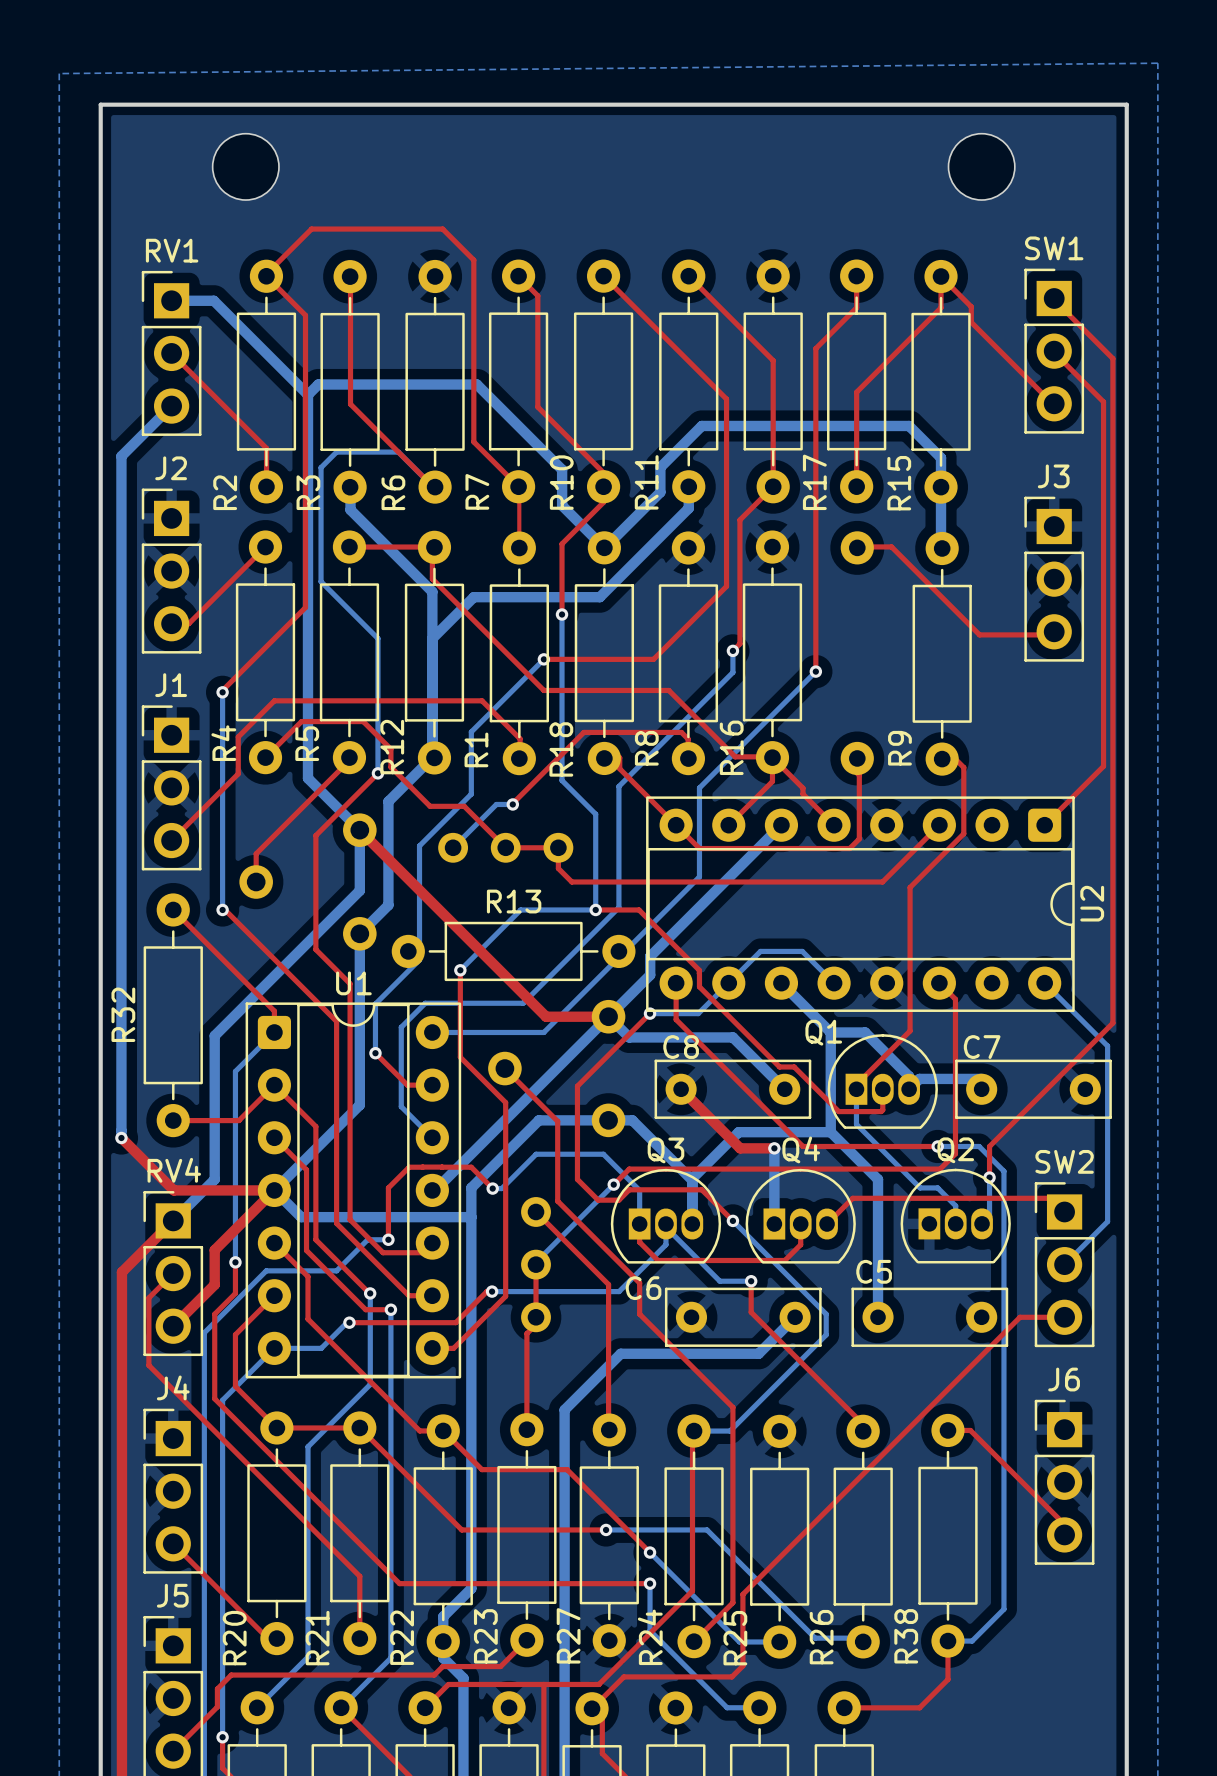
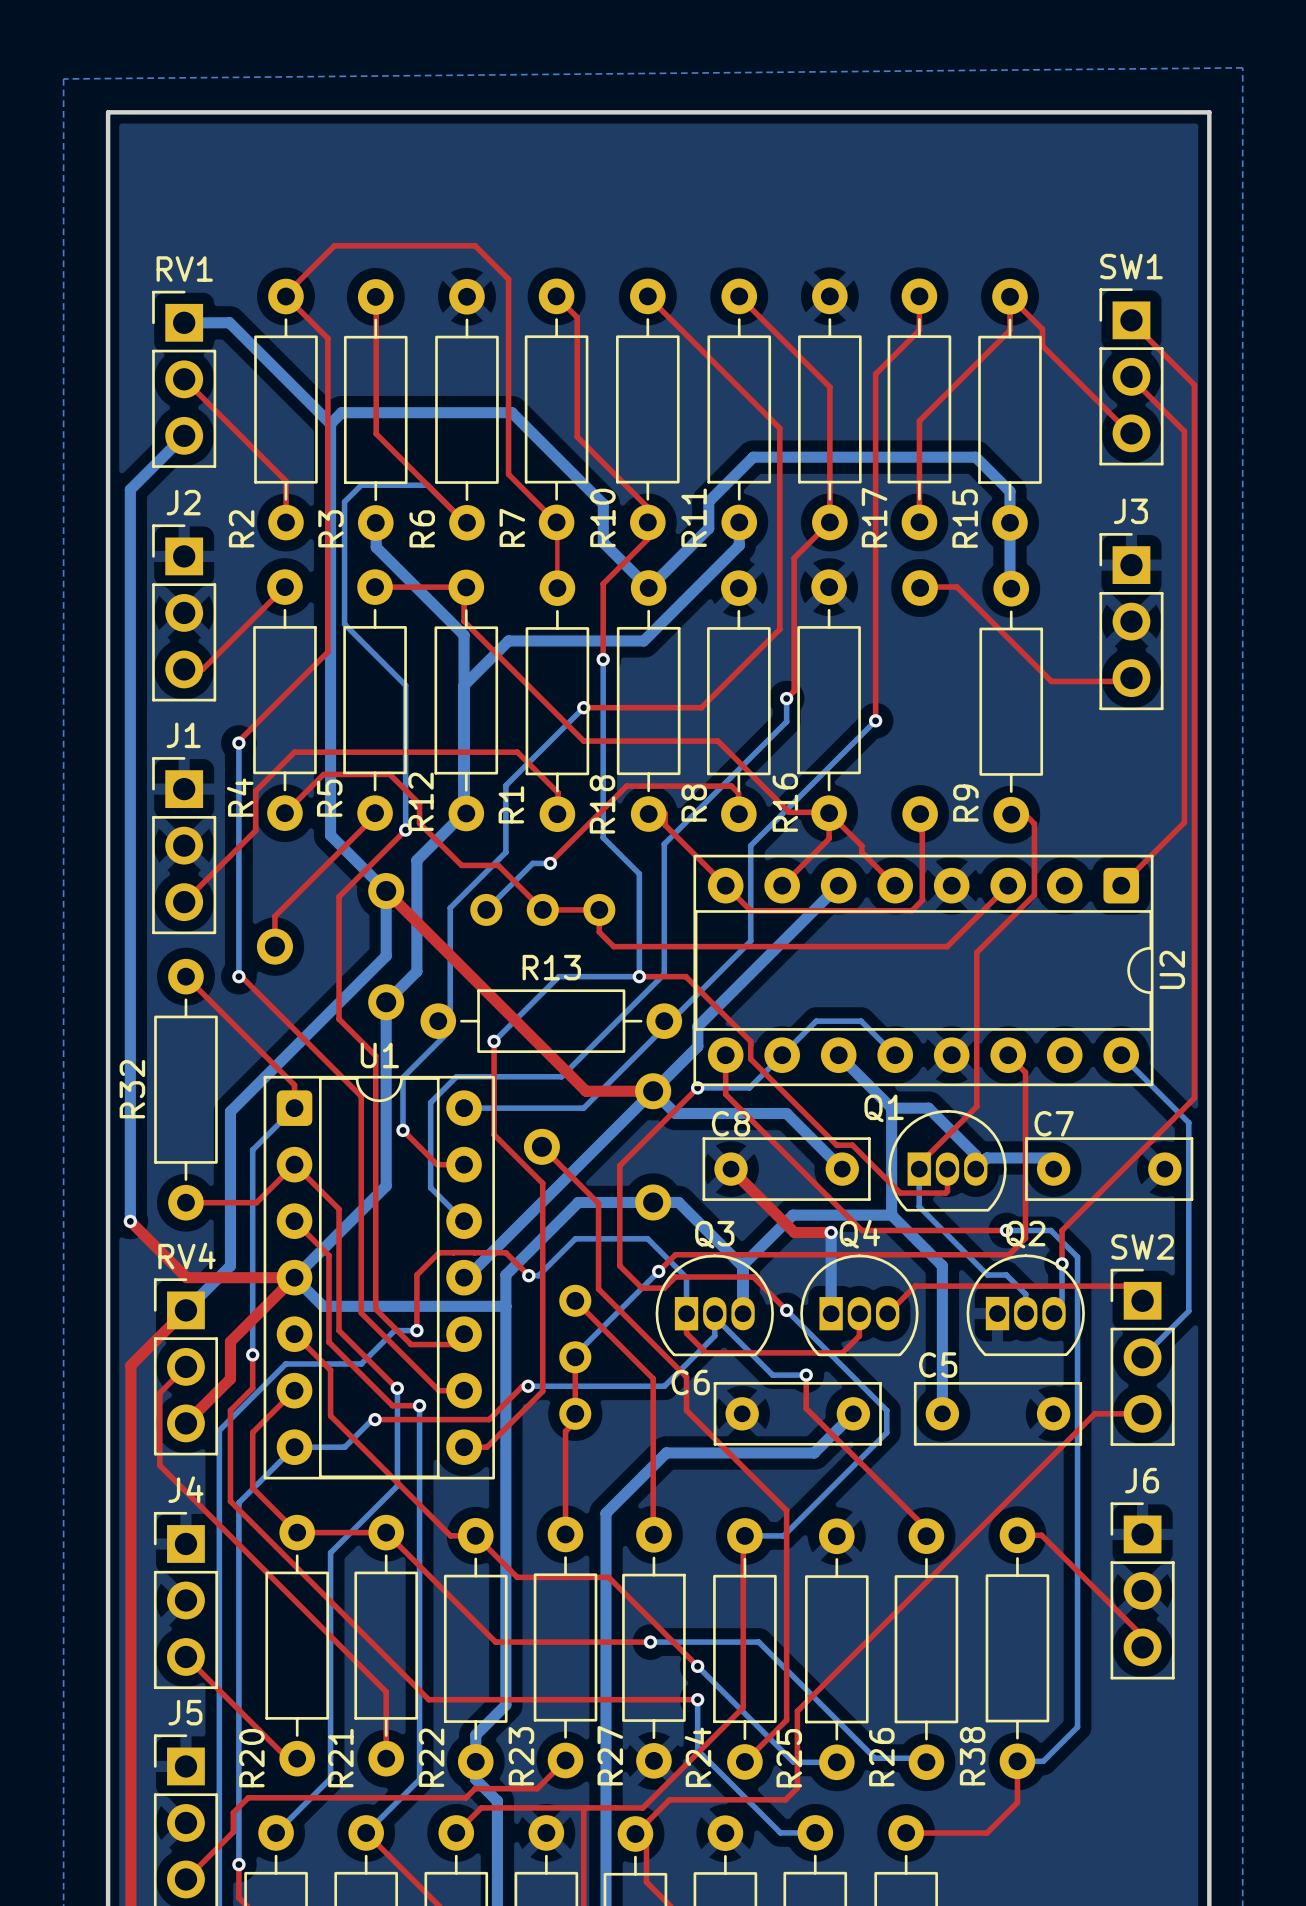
part: (245, 166) -> none
part: (981, 166) -> none

